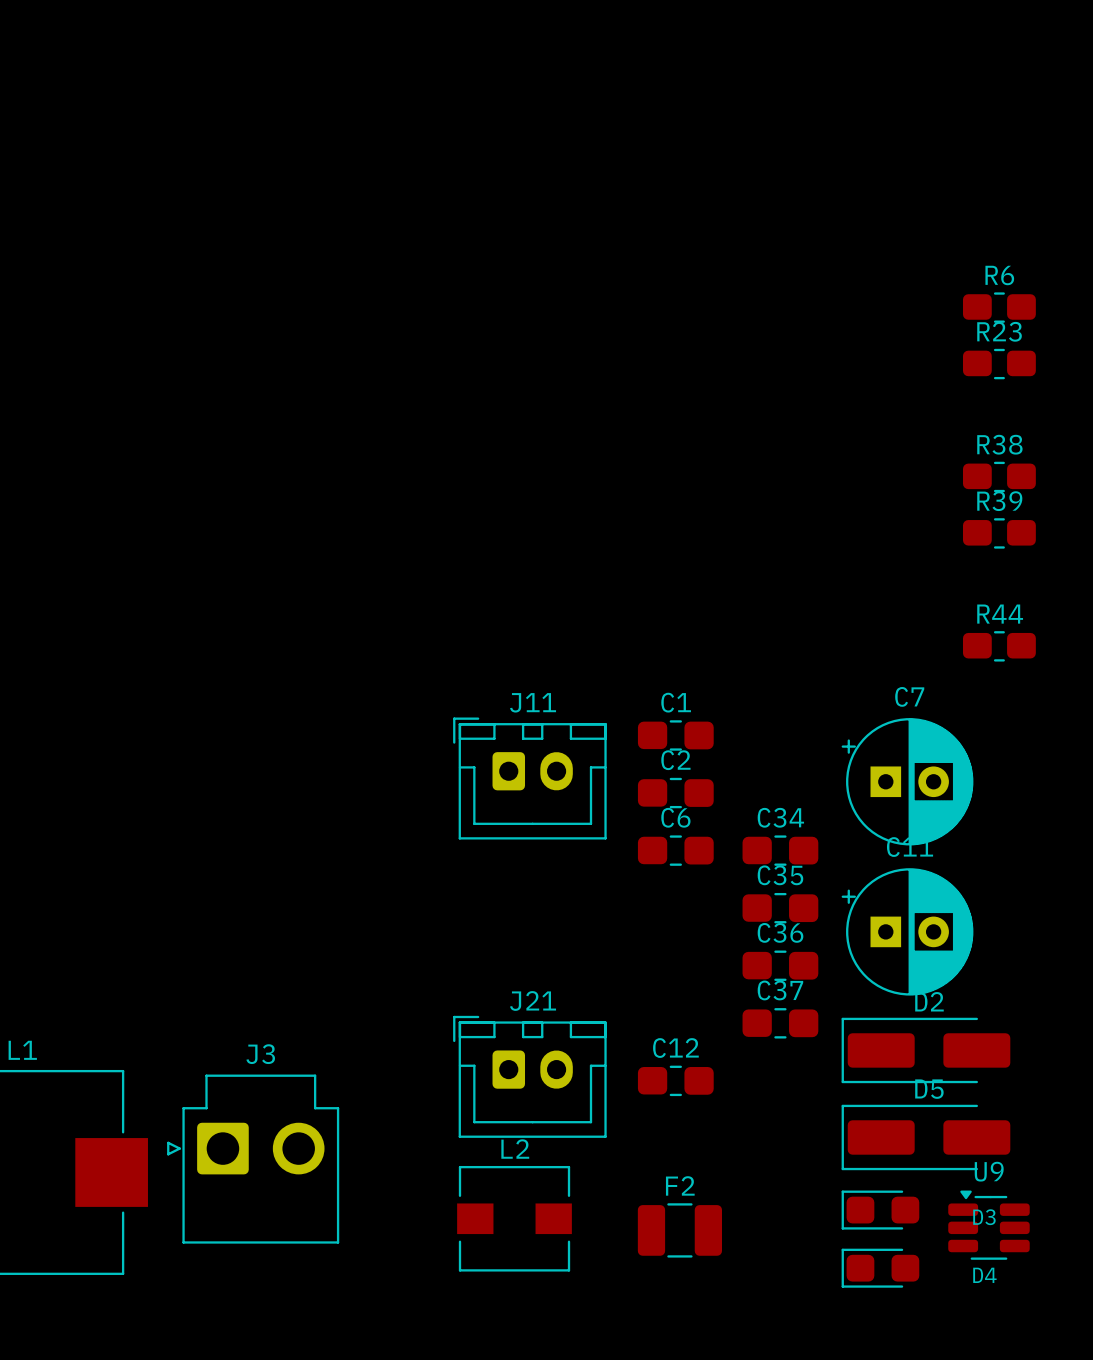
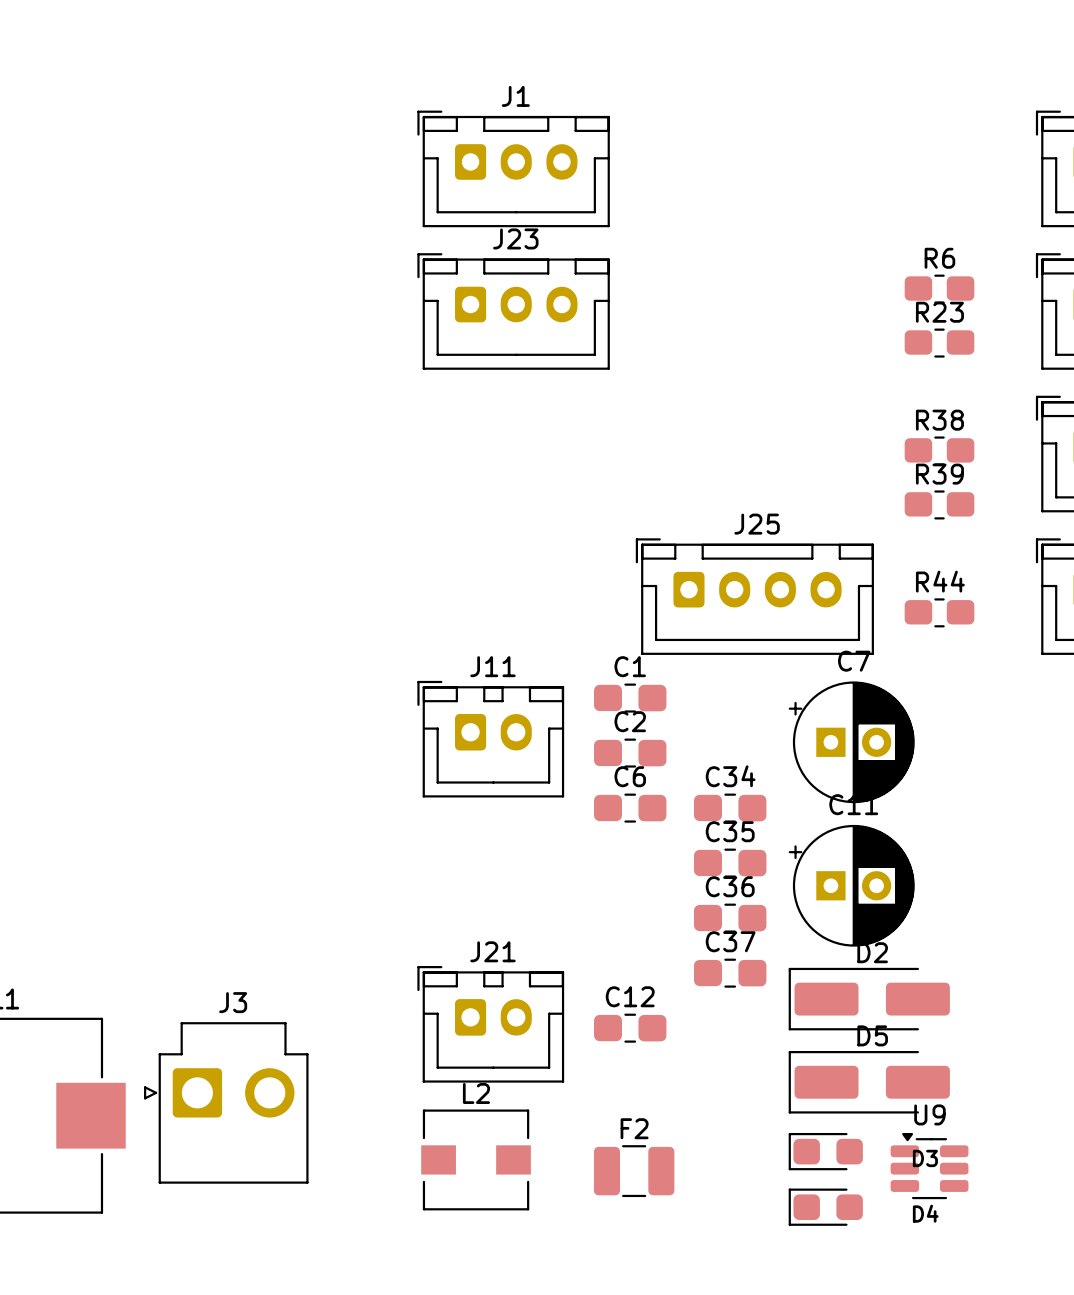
J1: none -> (513, 168)
J23: none -> (513, 311)
J25: none -> (754, 596)

